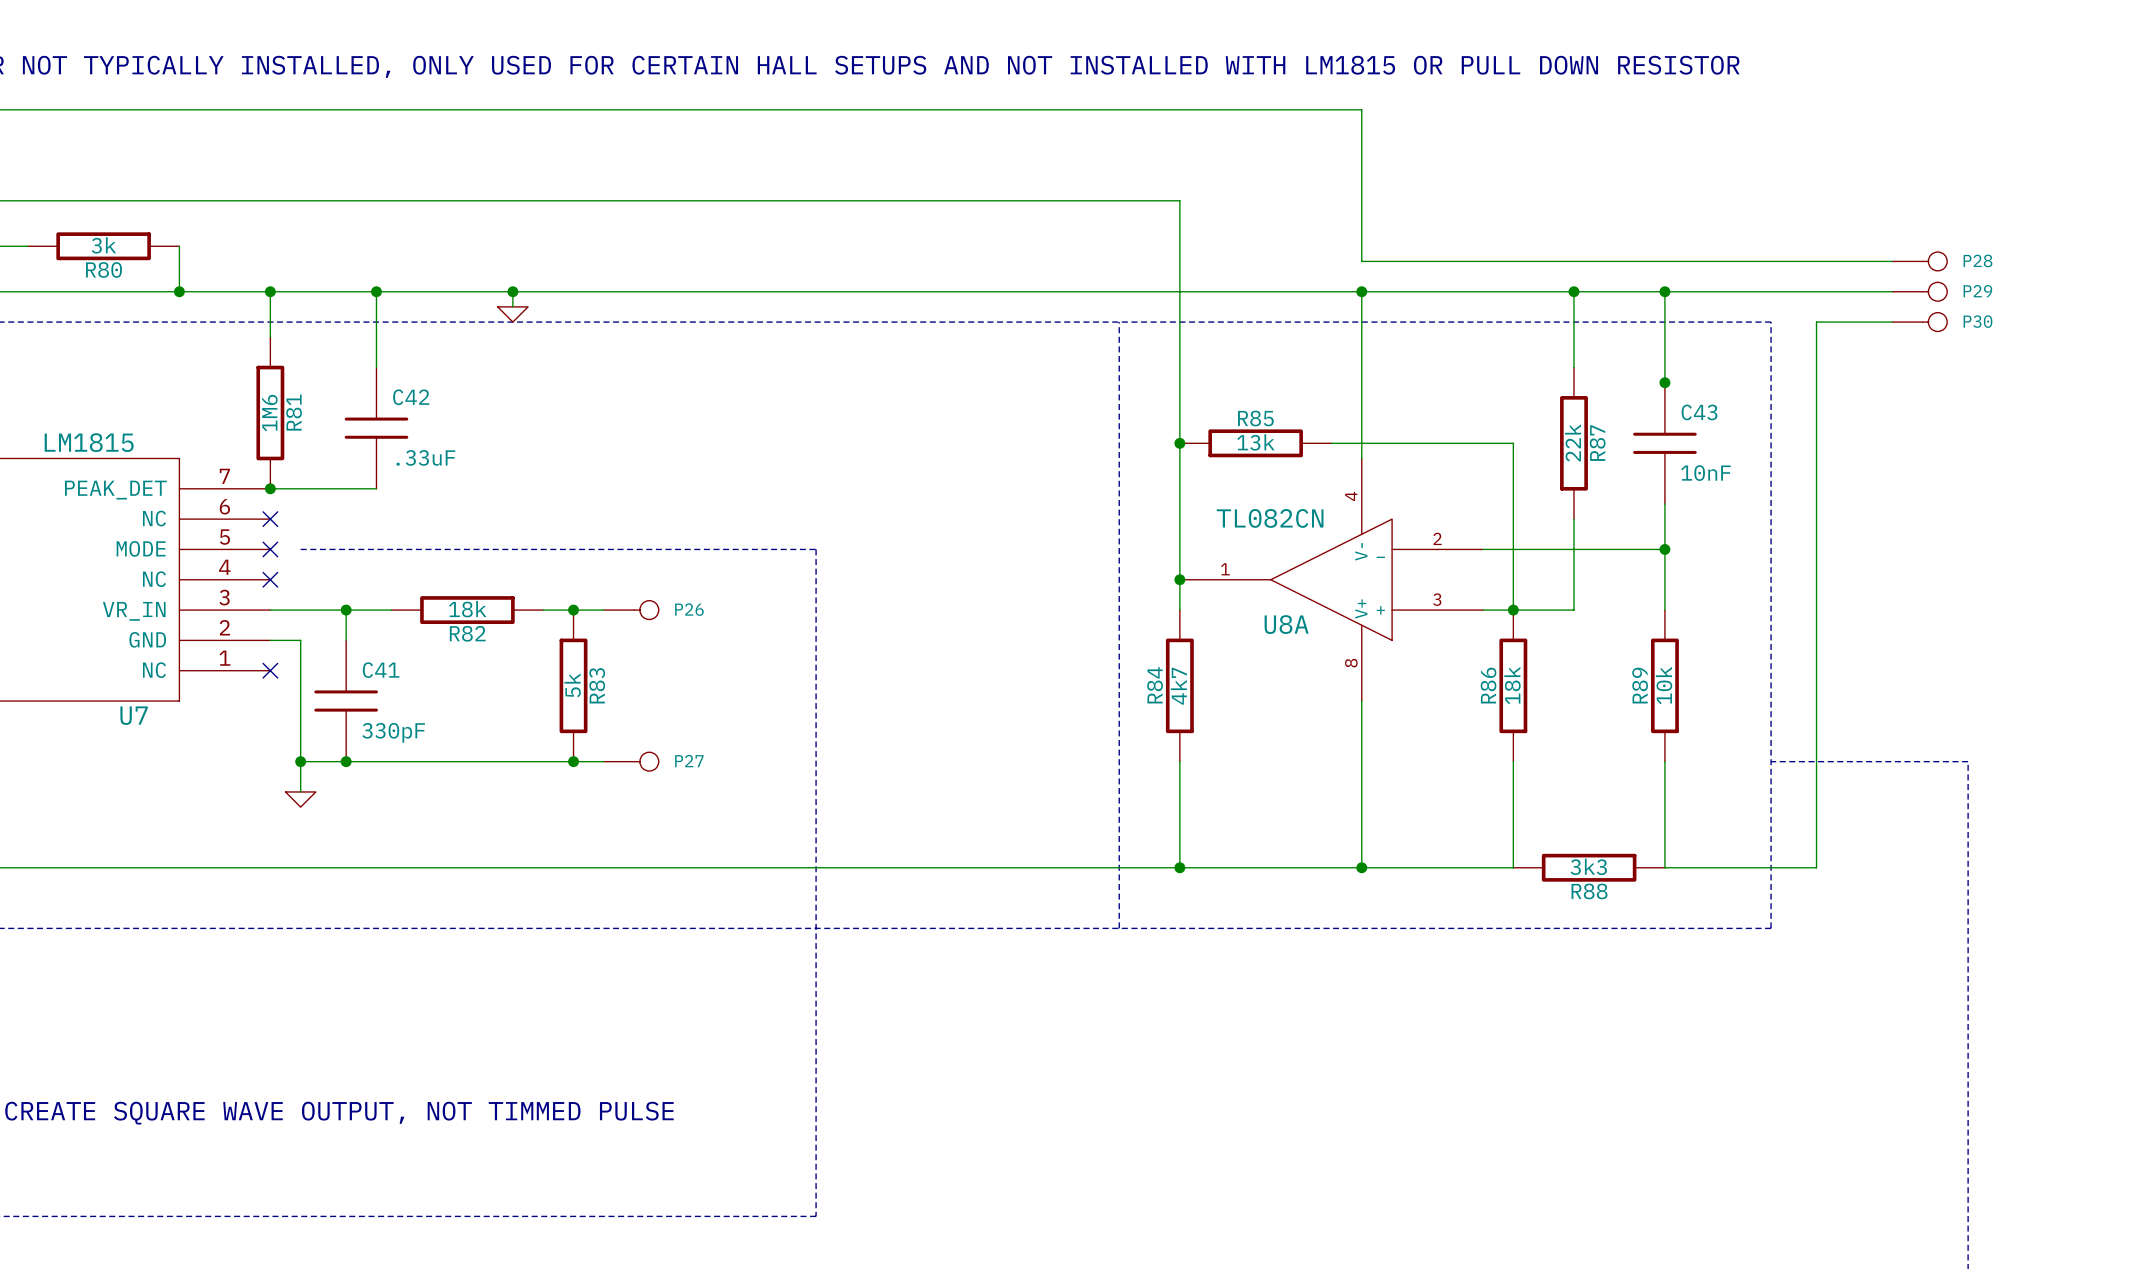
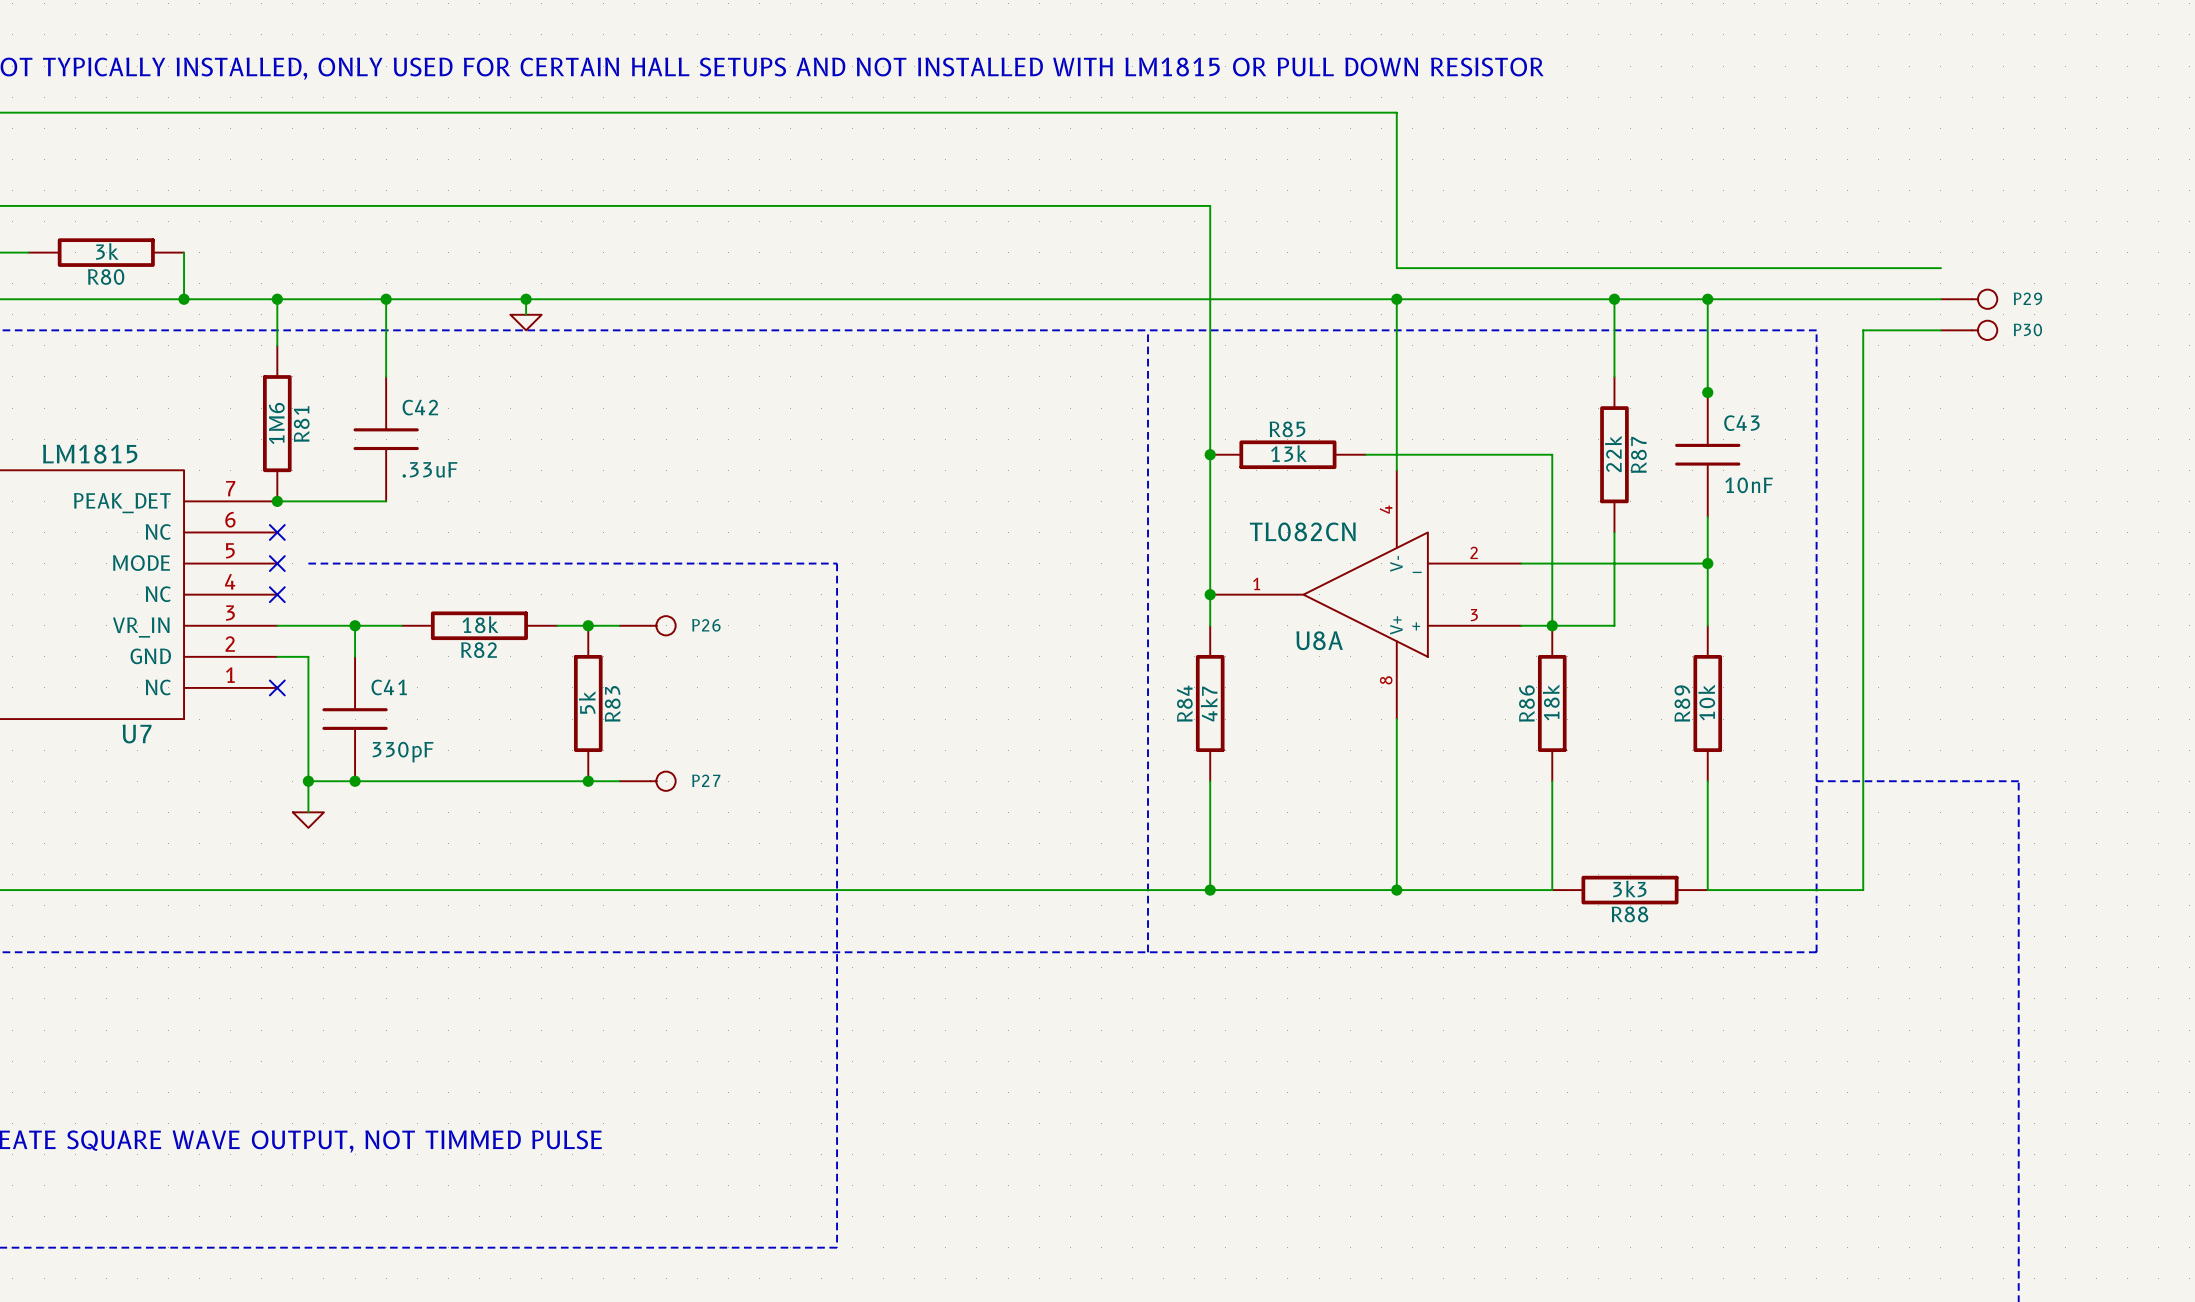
P28: (1919, 261) -> none

